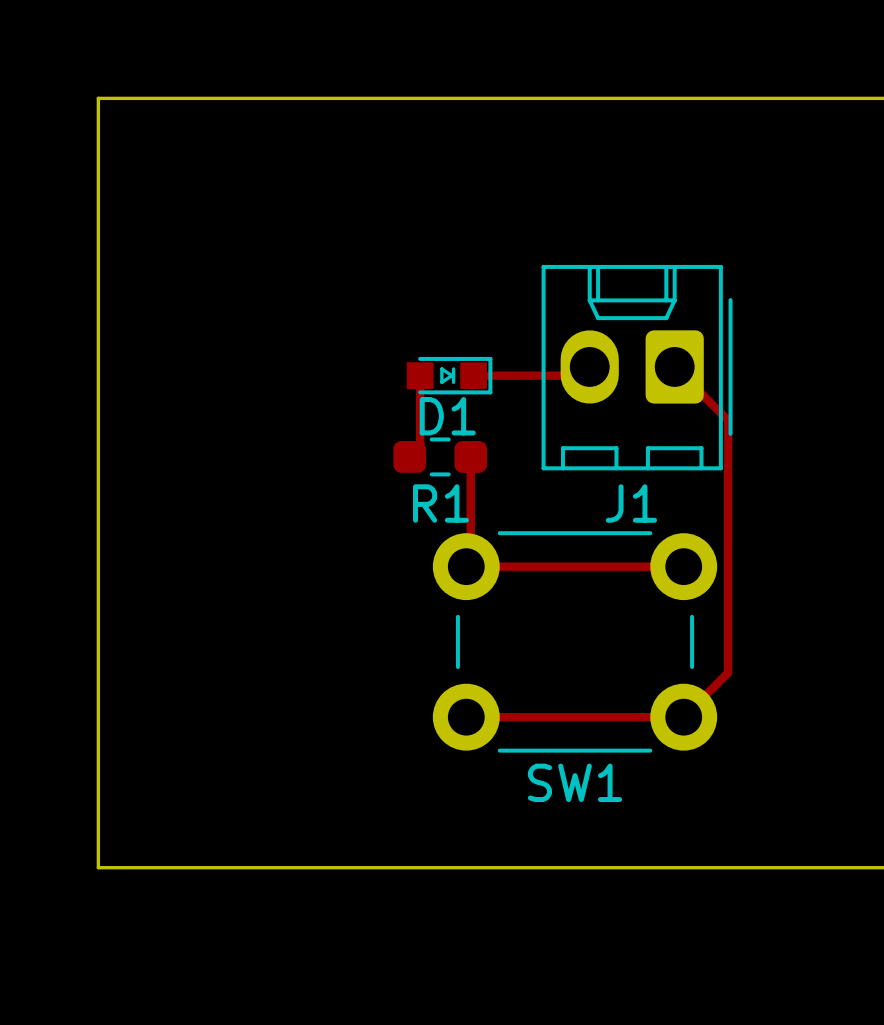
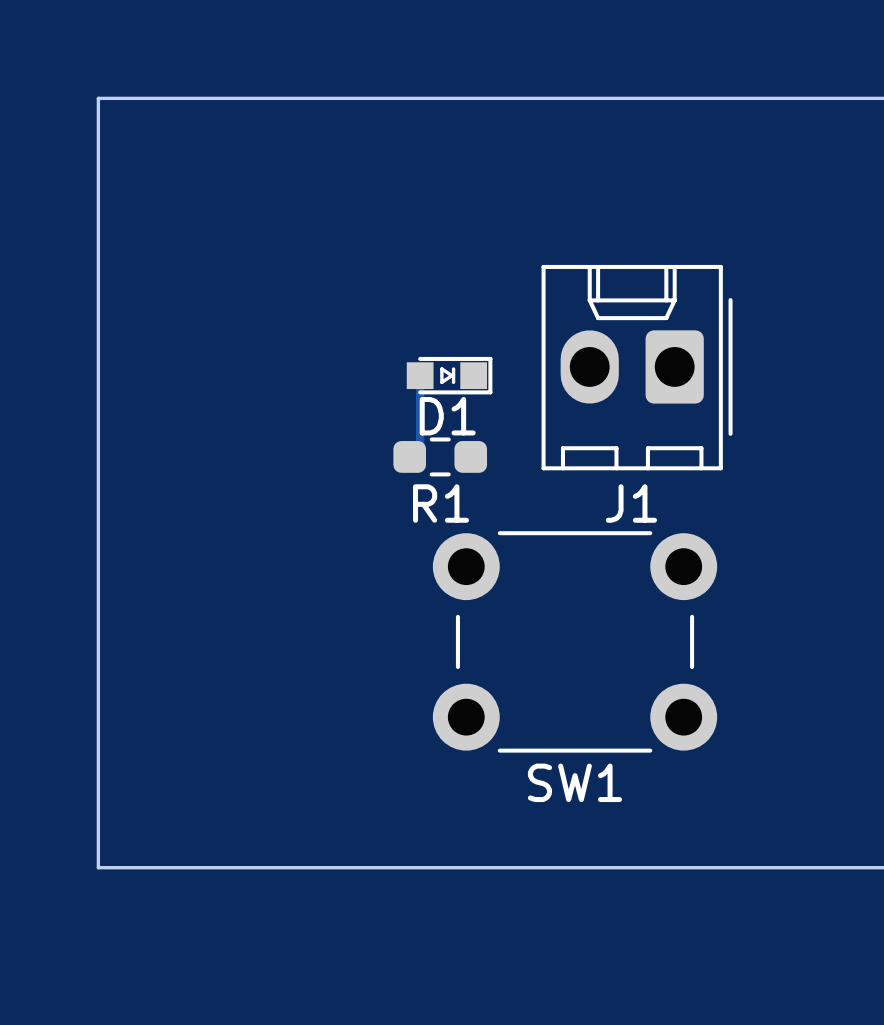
track: (589, 366) (581, 375) (473, 375) -> none
track: (674, 366) (728, 420) (728, 672) (683, 717) (466, 717) -> none
track: (470, 456) (470, 562) (466, 566) (683, 566) -> none

